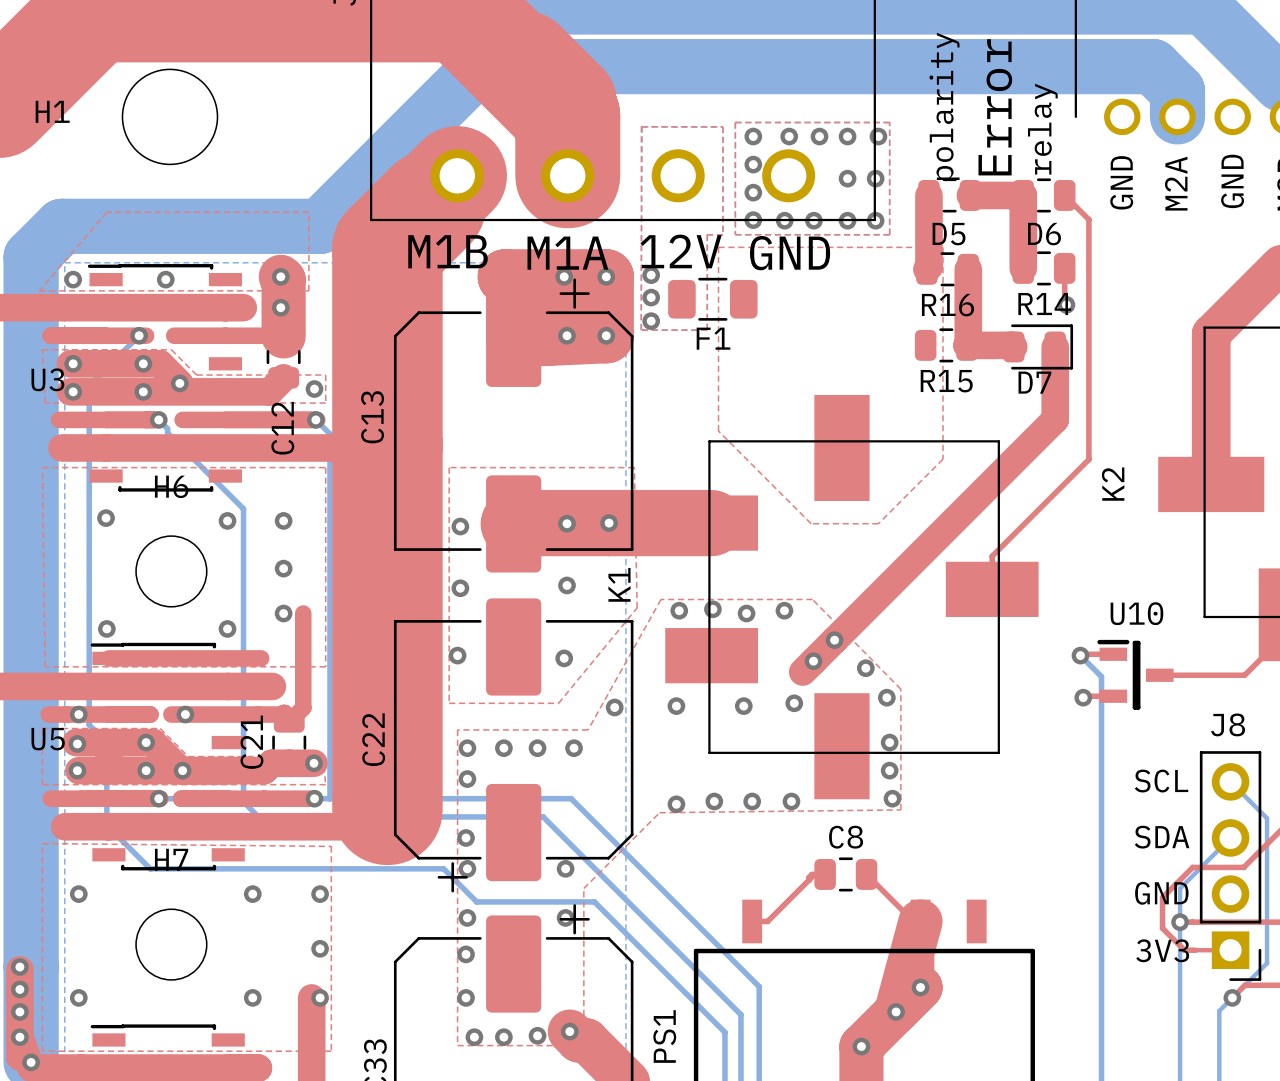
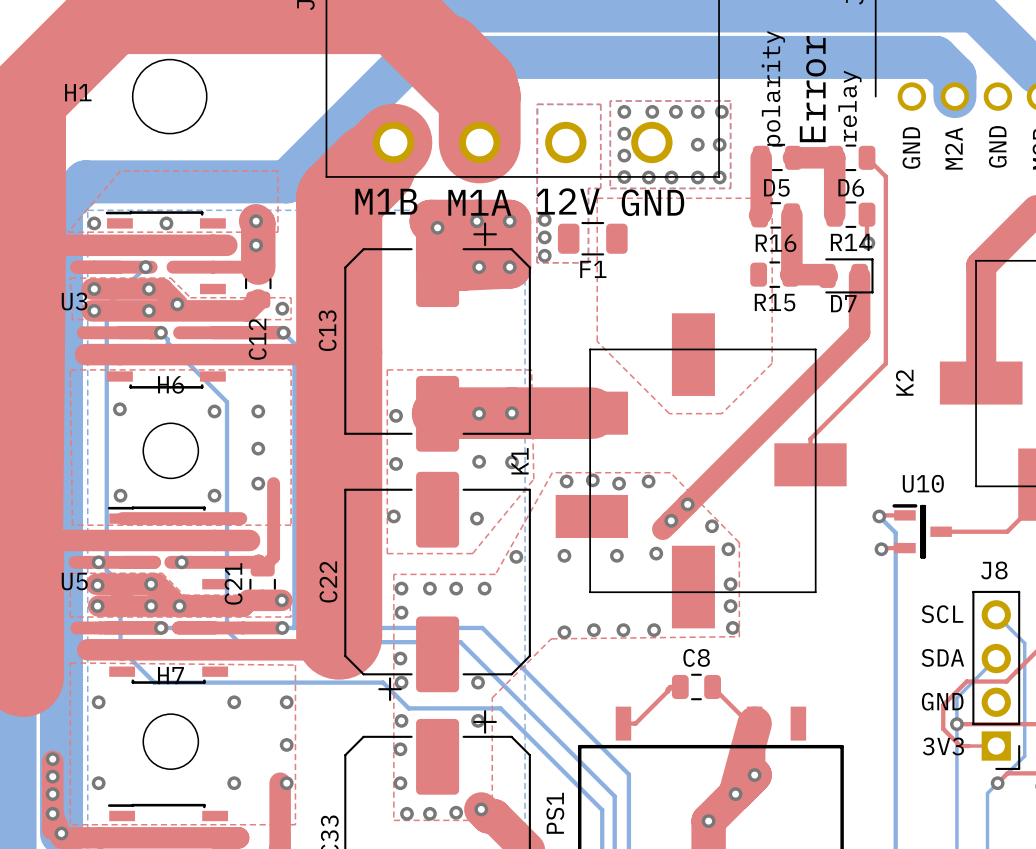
via: none -> (437, 227)
via: none -> (512, 462)

